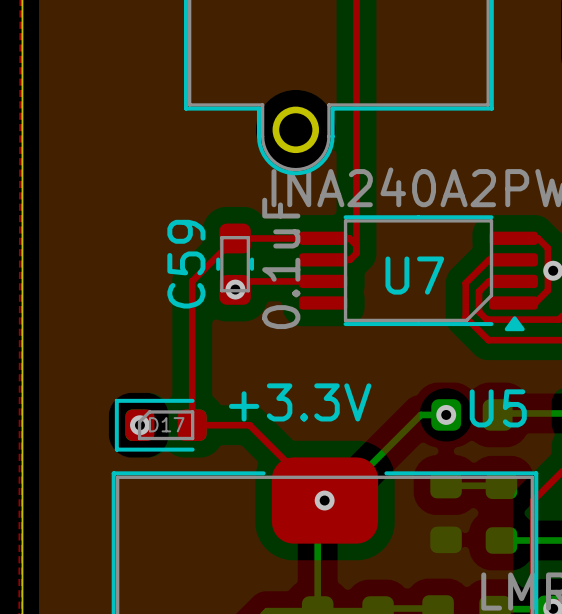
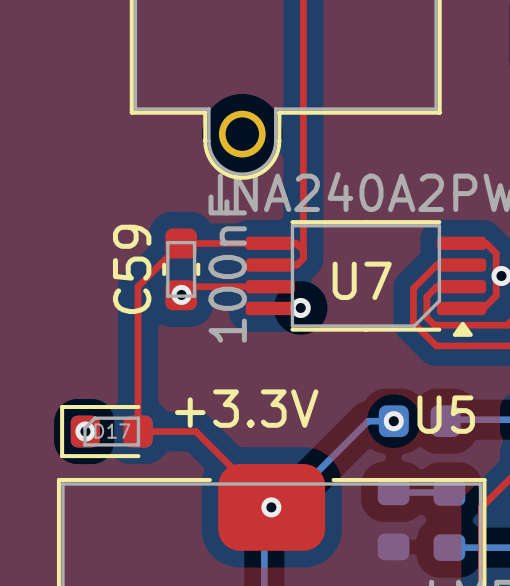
C59 value: 0.1uF (281, 263) -> 100nF (227, 268)
via: none -> (300, 307)

